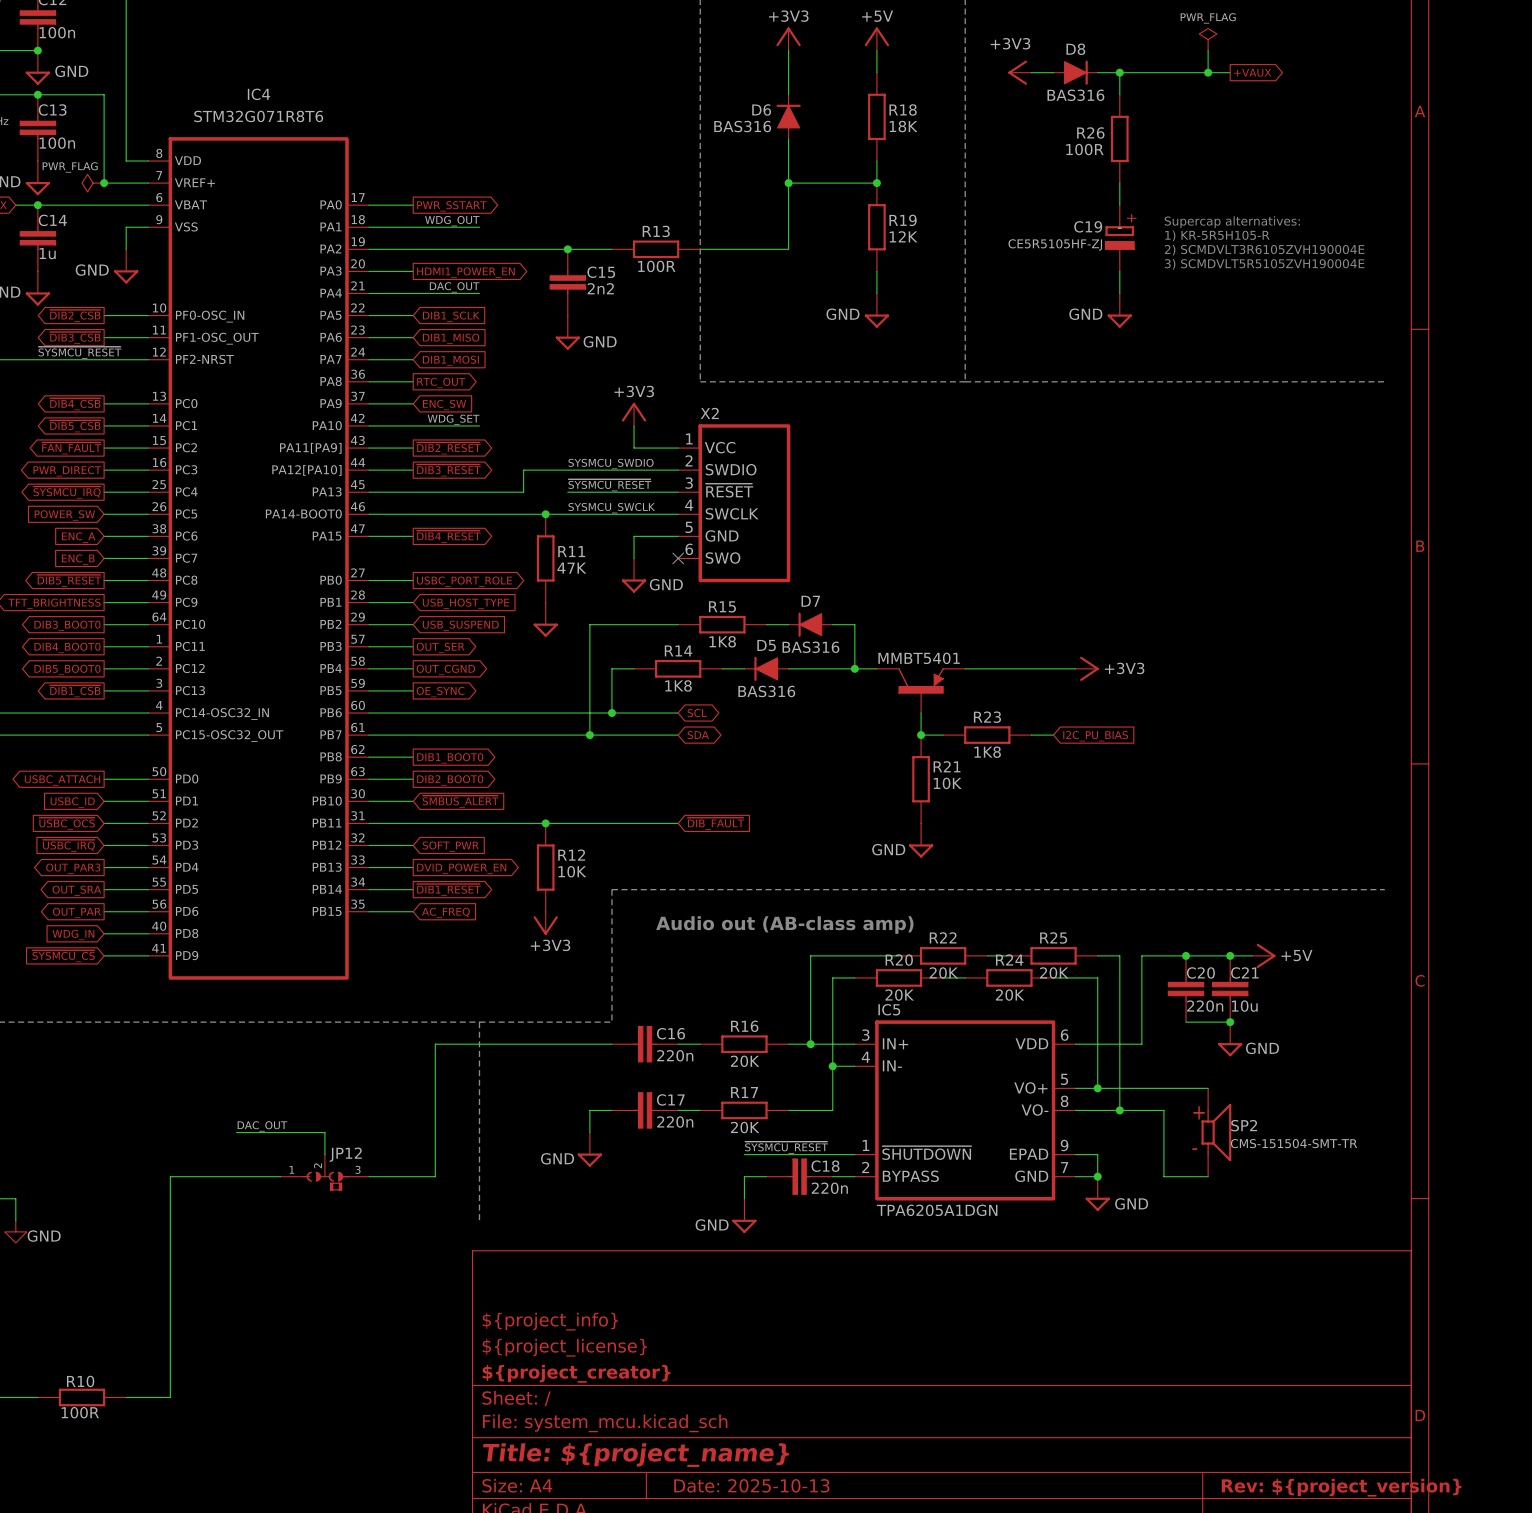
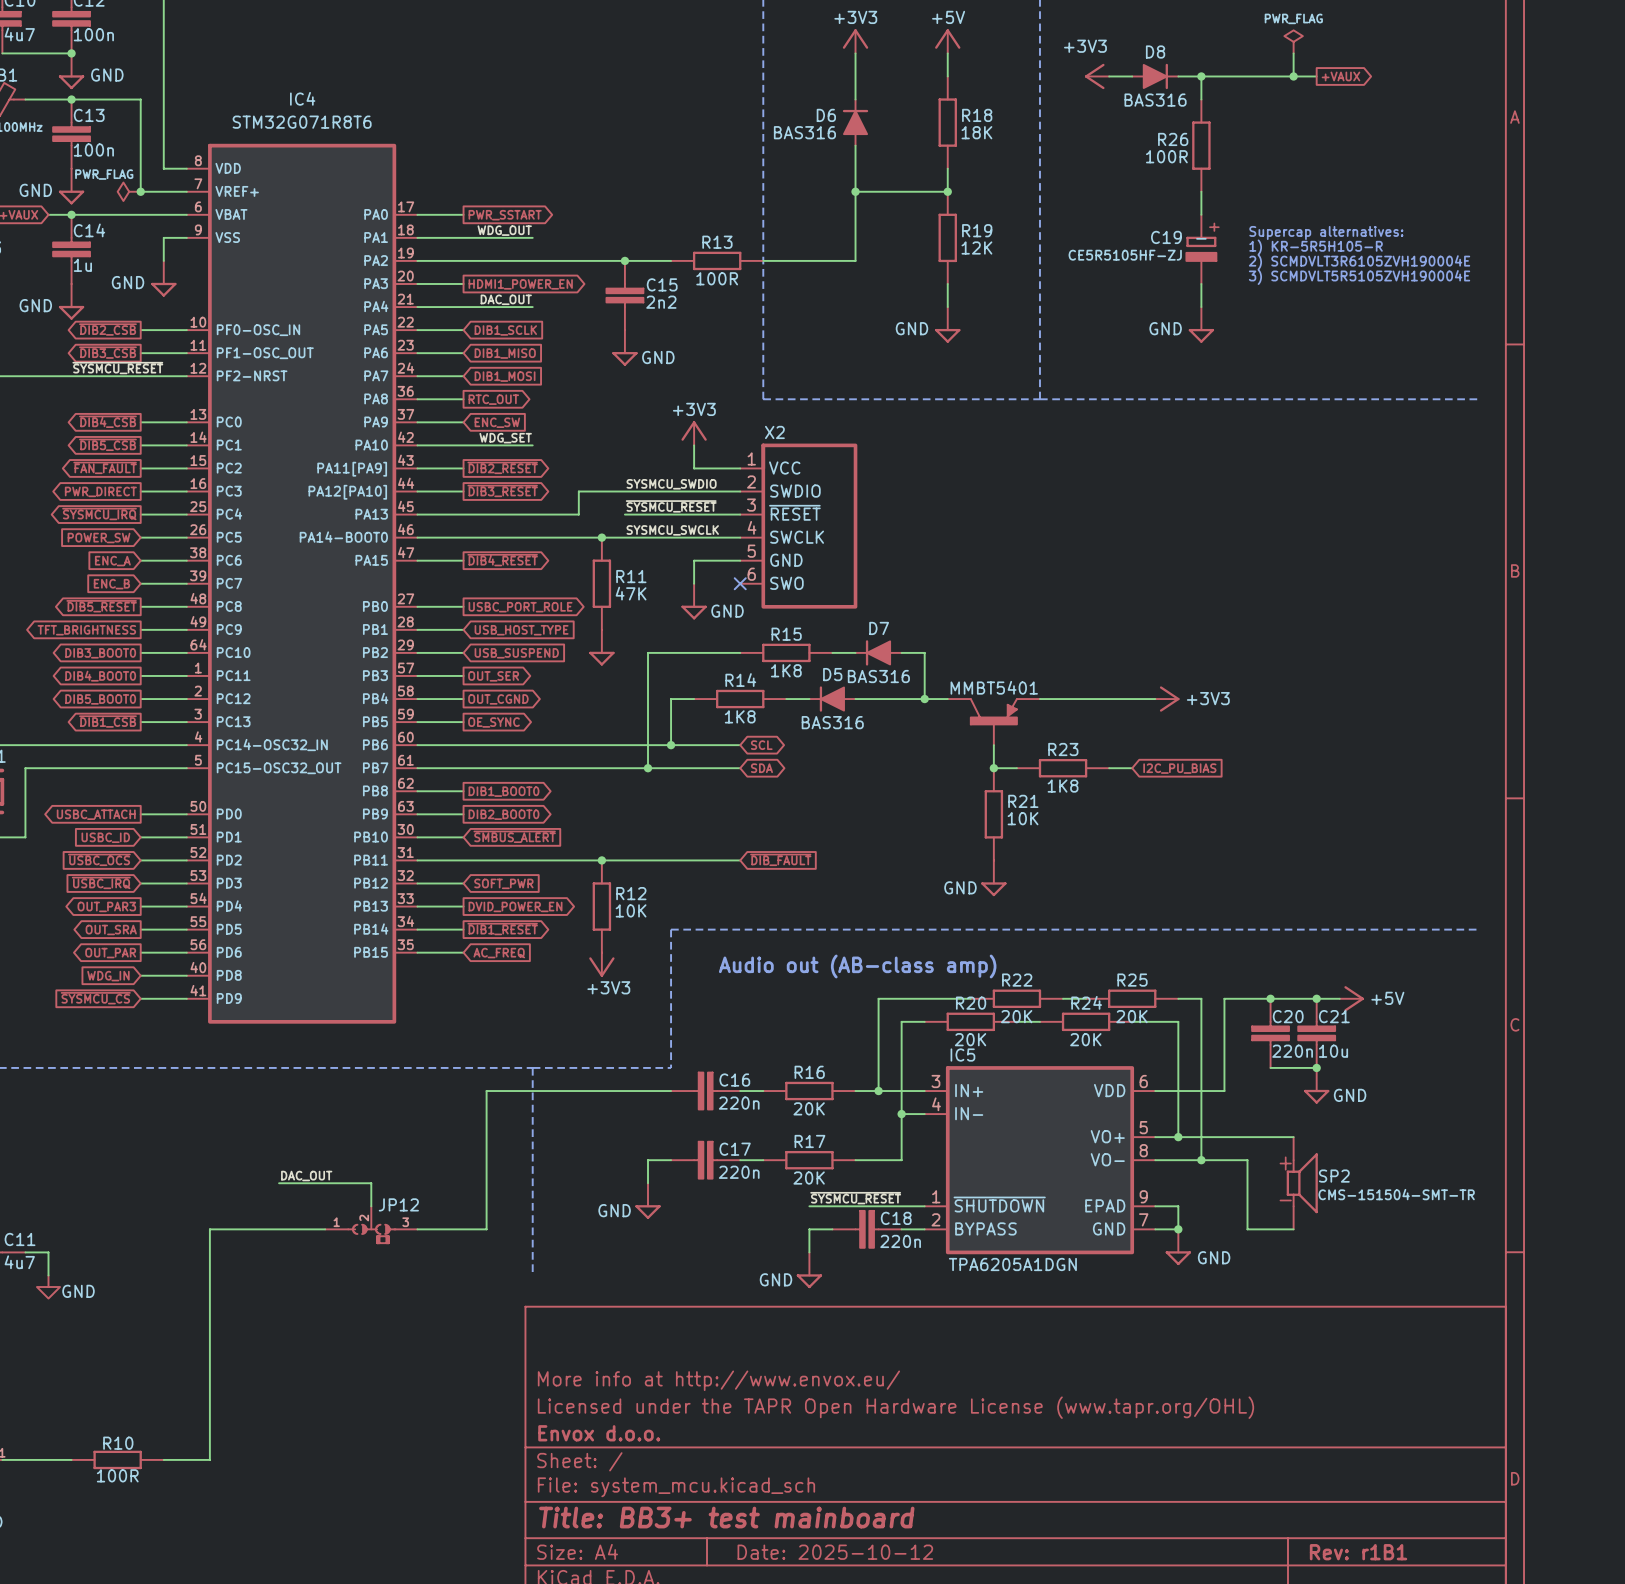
title block: ${project_info} (550, 1321) -> More info at http://www.envox.eu/ (718, 1380)
title block: ${project_license} (564, 1347) -> Licensed under the TAPR Open Hardware License (www.tapr.org/OHL) (895, 1407)
title block: ${project_creator} (576, 1373) -> Envox d.o.o. (599, 1433)
title block: Title: ${project_name} (636, 1455) -> Title: BB3+ test mainboard (726, 1517)
title block: Date: 2025-10-13 (751, 1485) -> Date: 2025-10-12 (835, 1552)
title block: Rev: ${project_version} (1341, 1487) -> Rev: r1B1 (1358, 1552)

